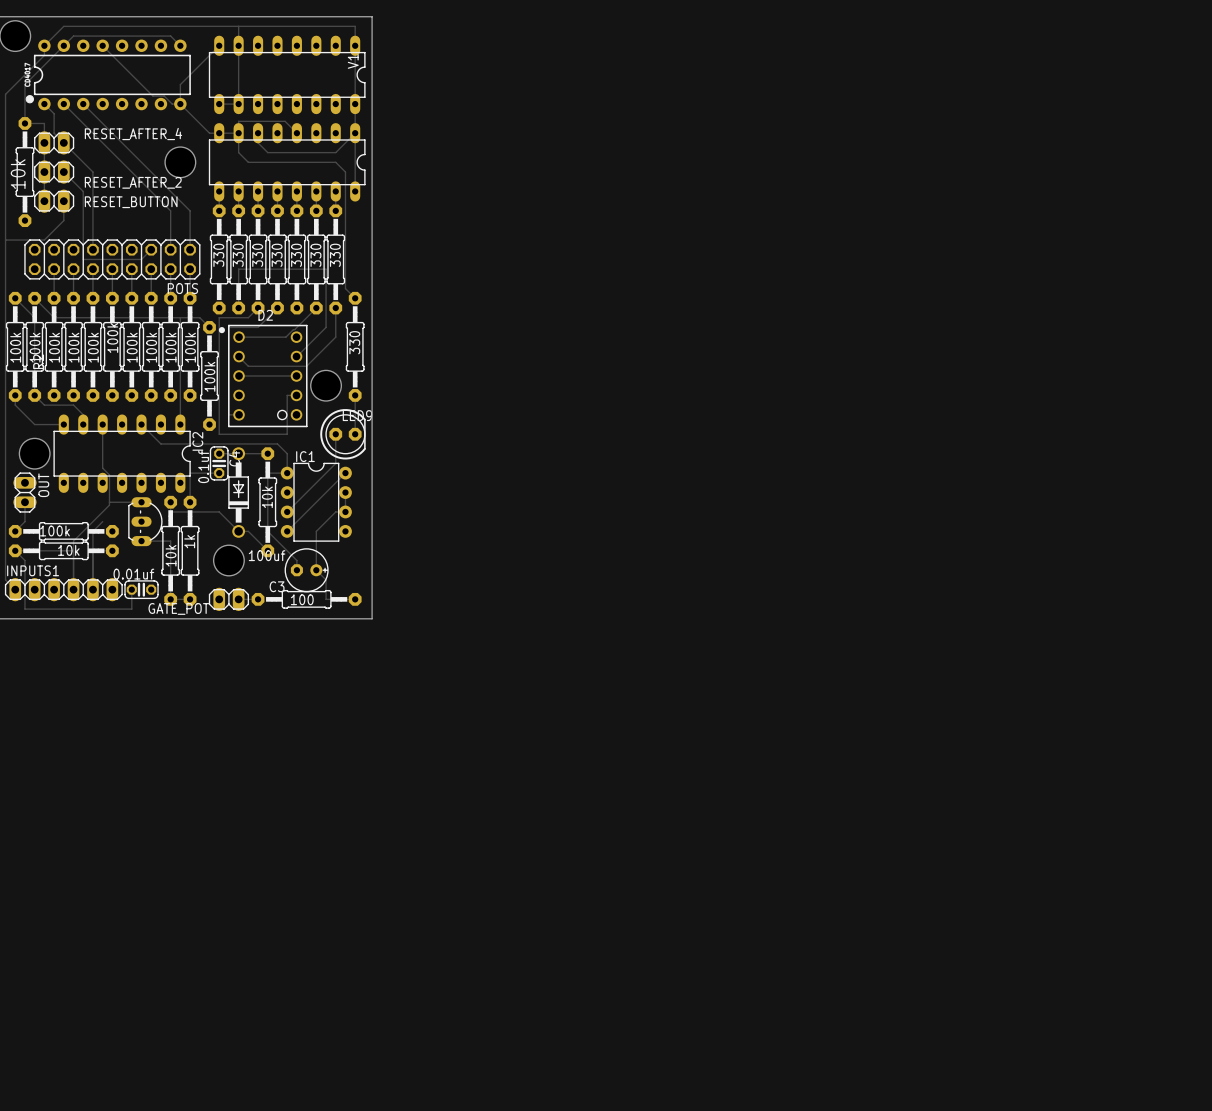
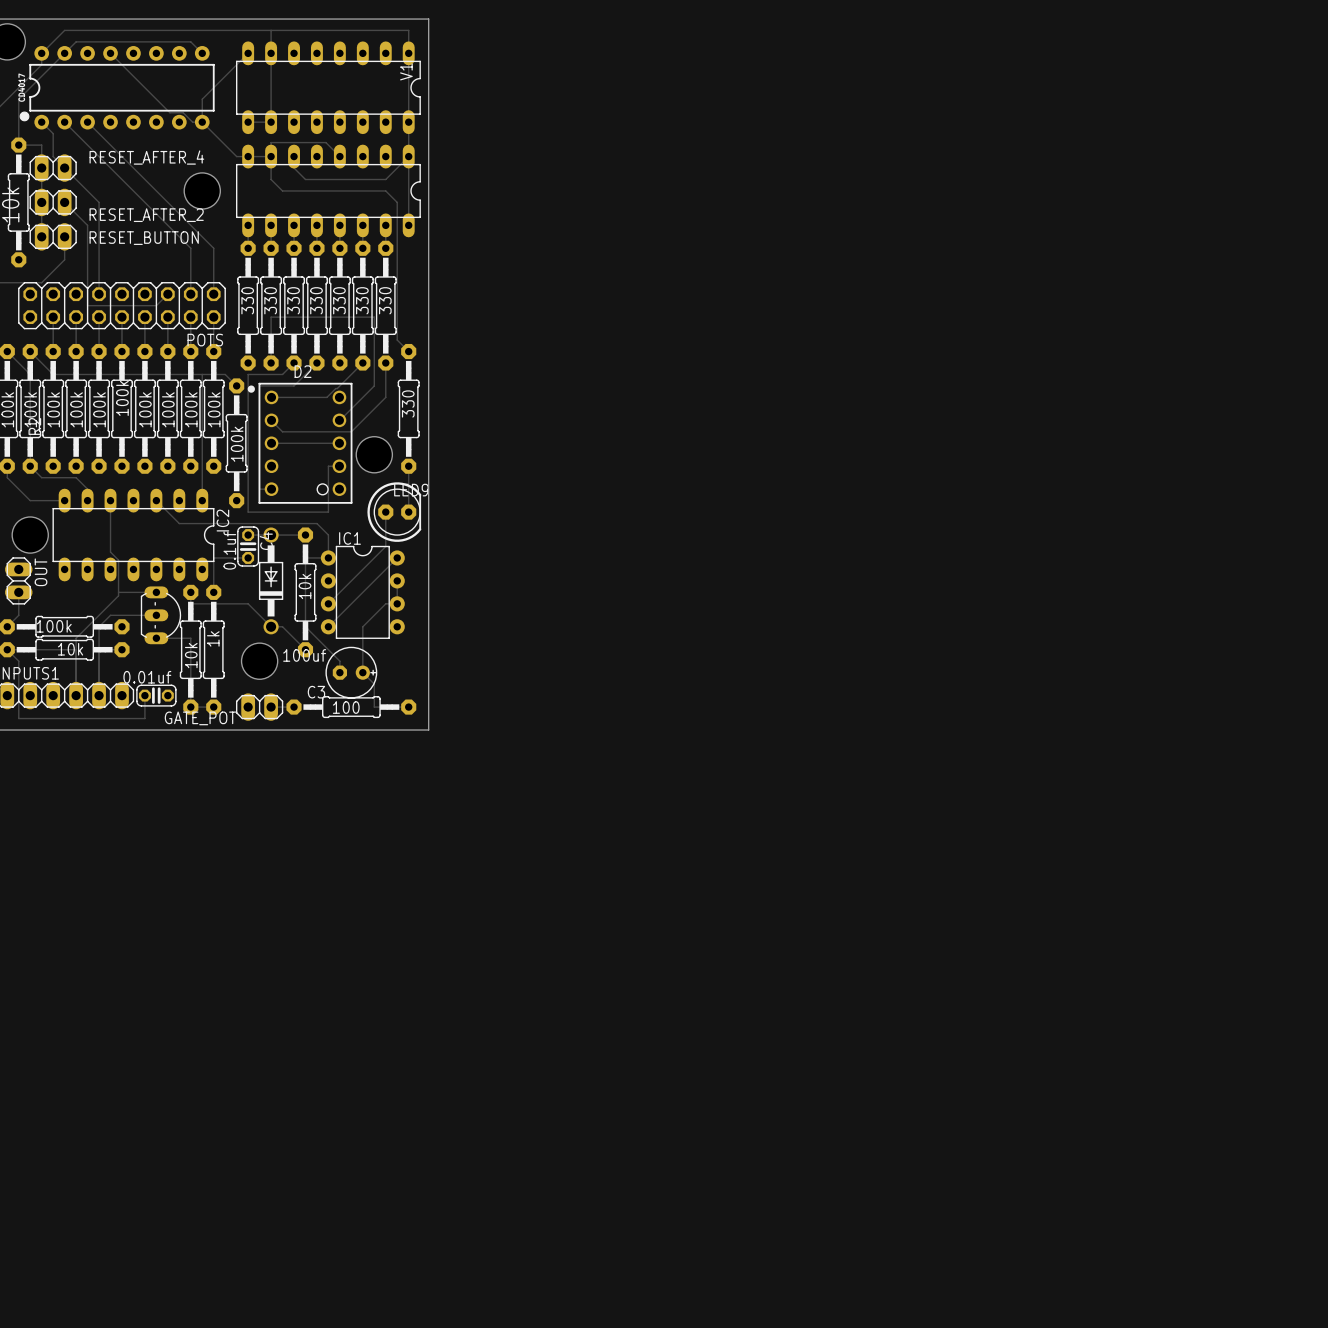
track: none -> (110, 615) (156, 615)

